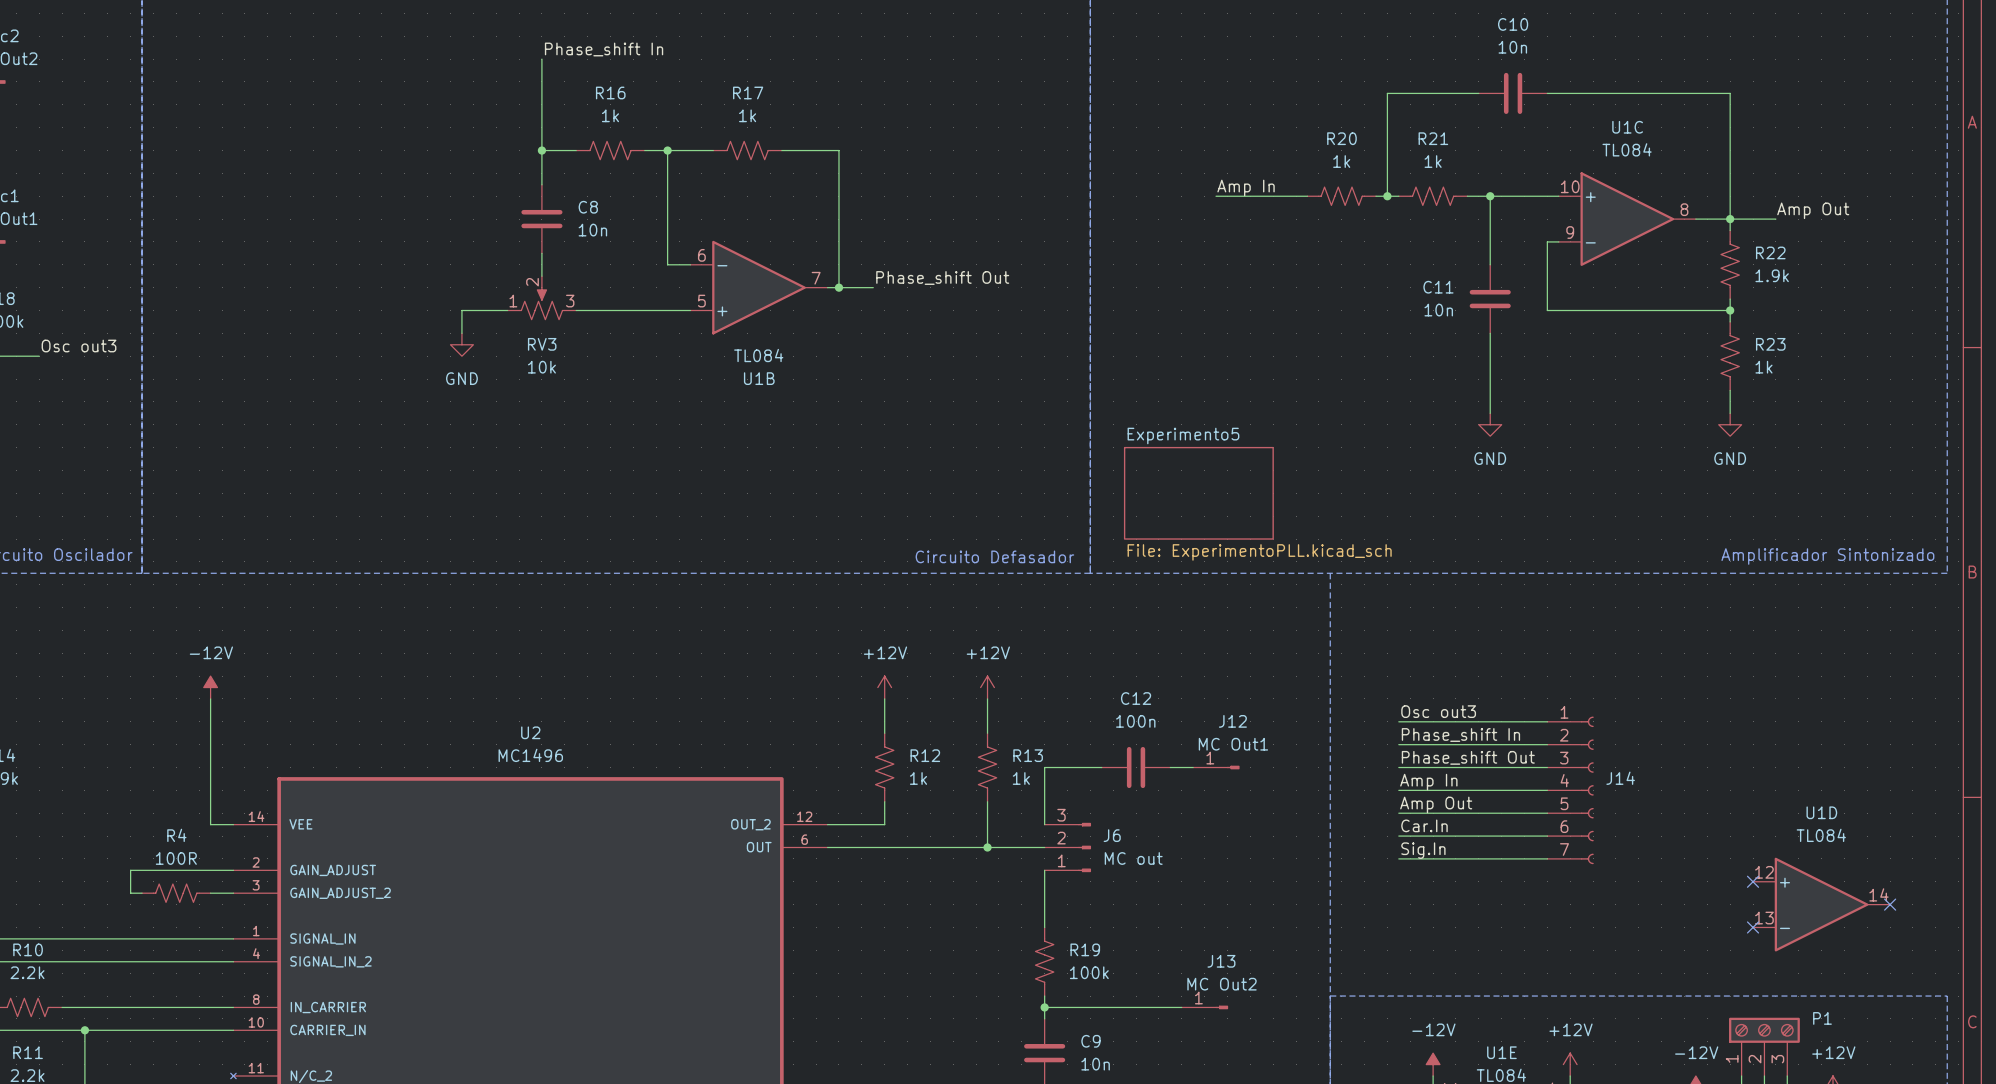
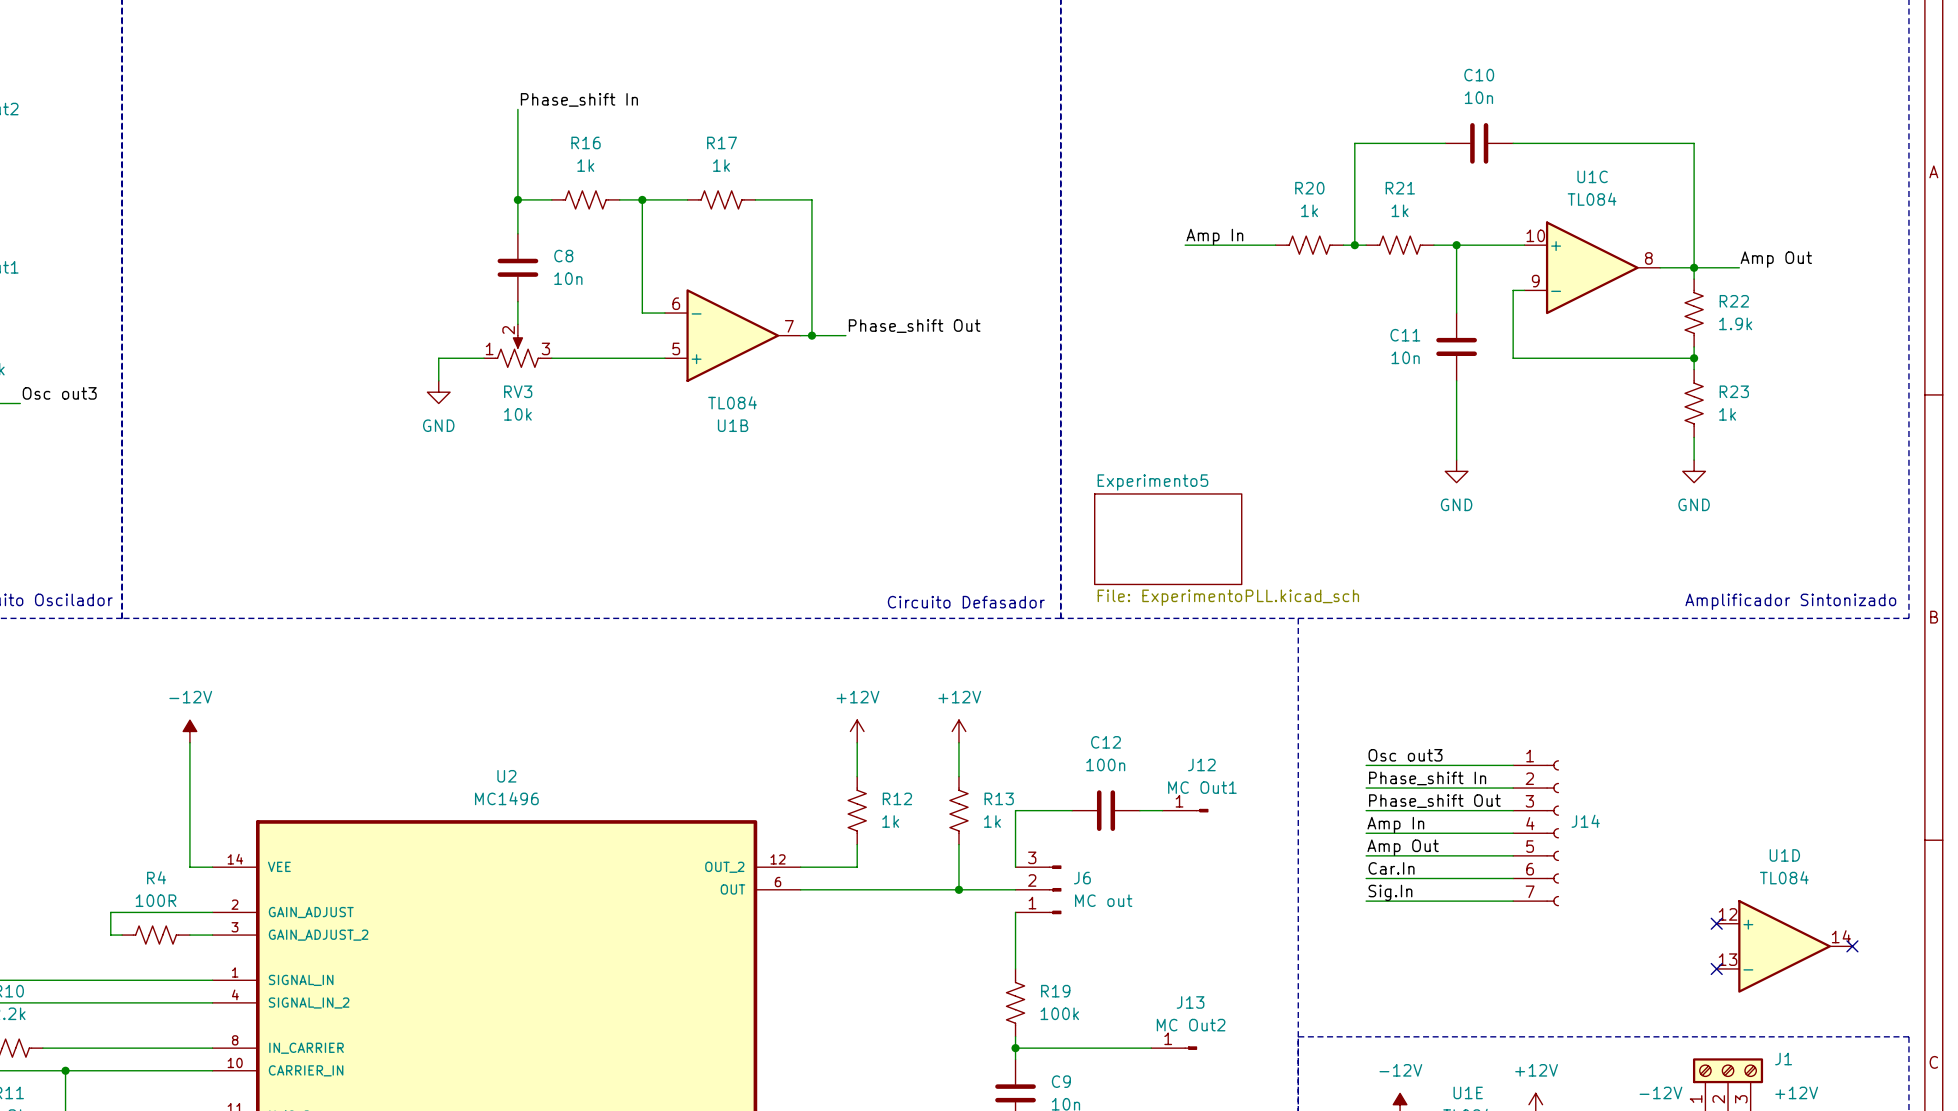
P1 name: P1 (1822, 1018) -> J1 (1783, 1059)

